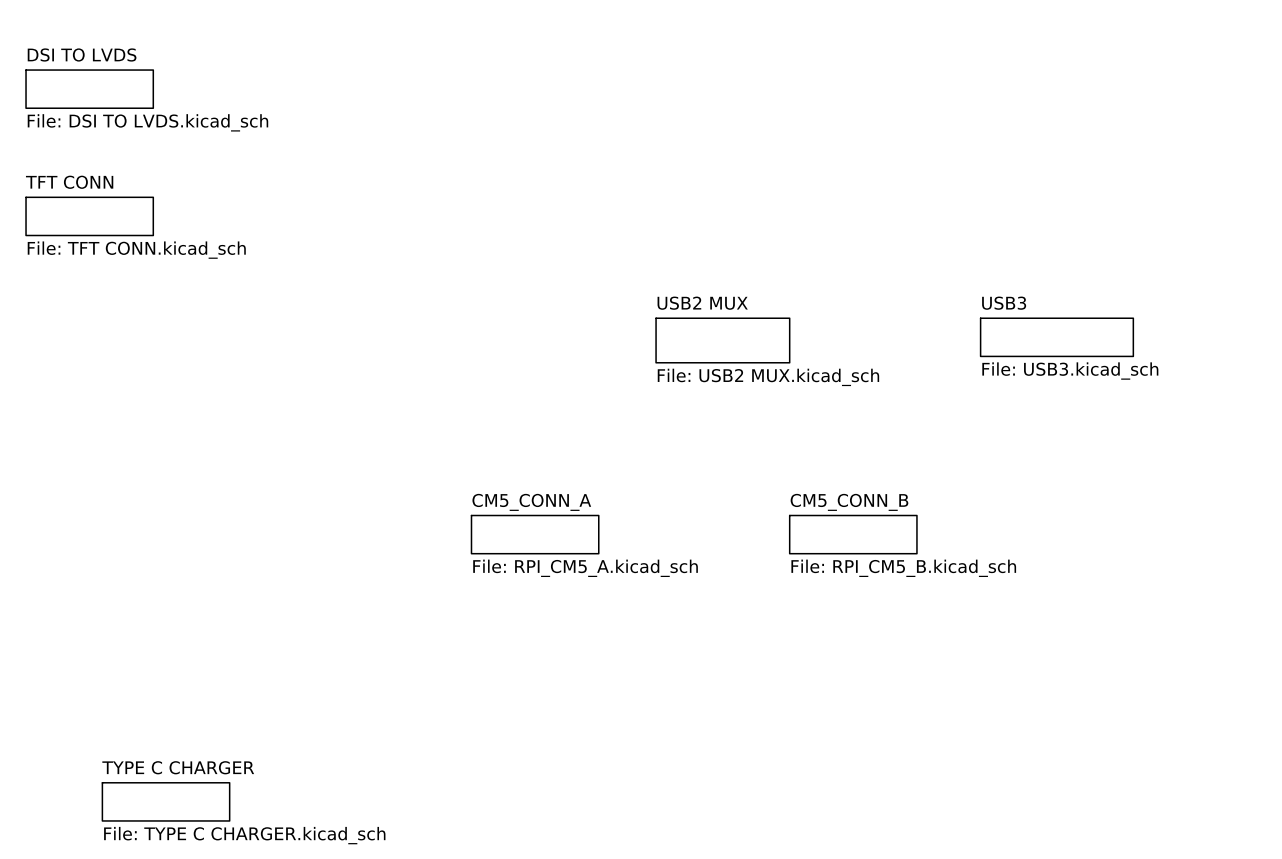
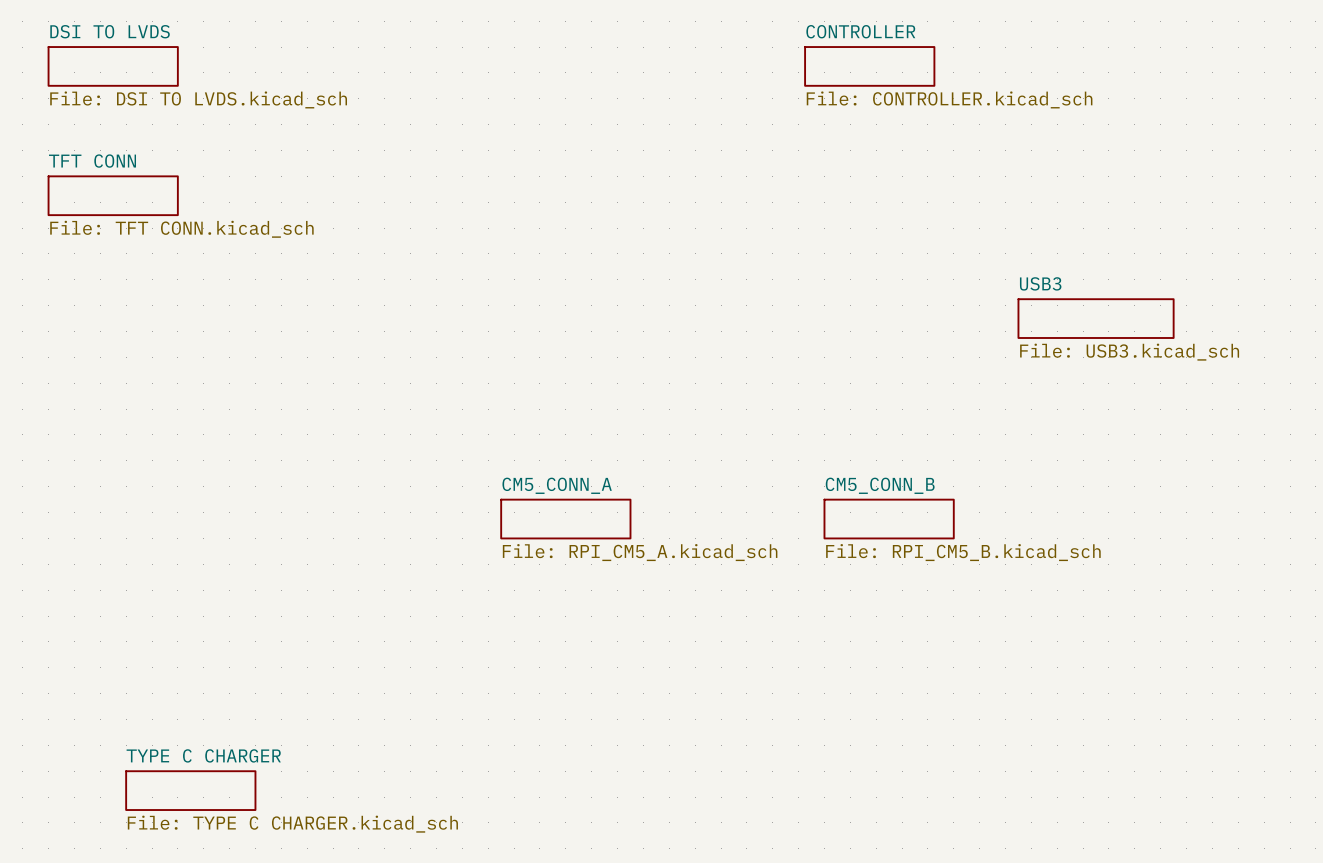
sheet CONTROLLER: none -> File: CONTROLLER.kicad_sch (869, 66)
sheet USB2 MUX: File: USB2 MUX.kicad_sch (722, 340) -> none

